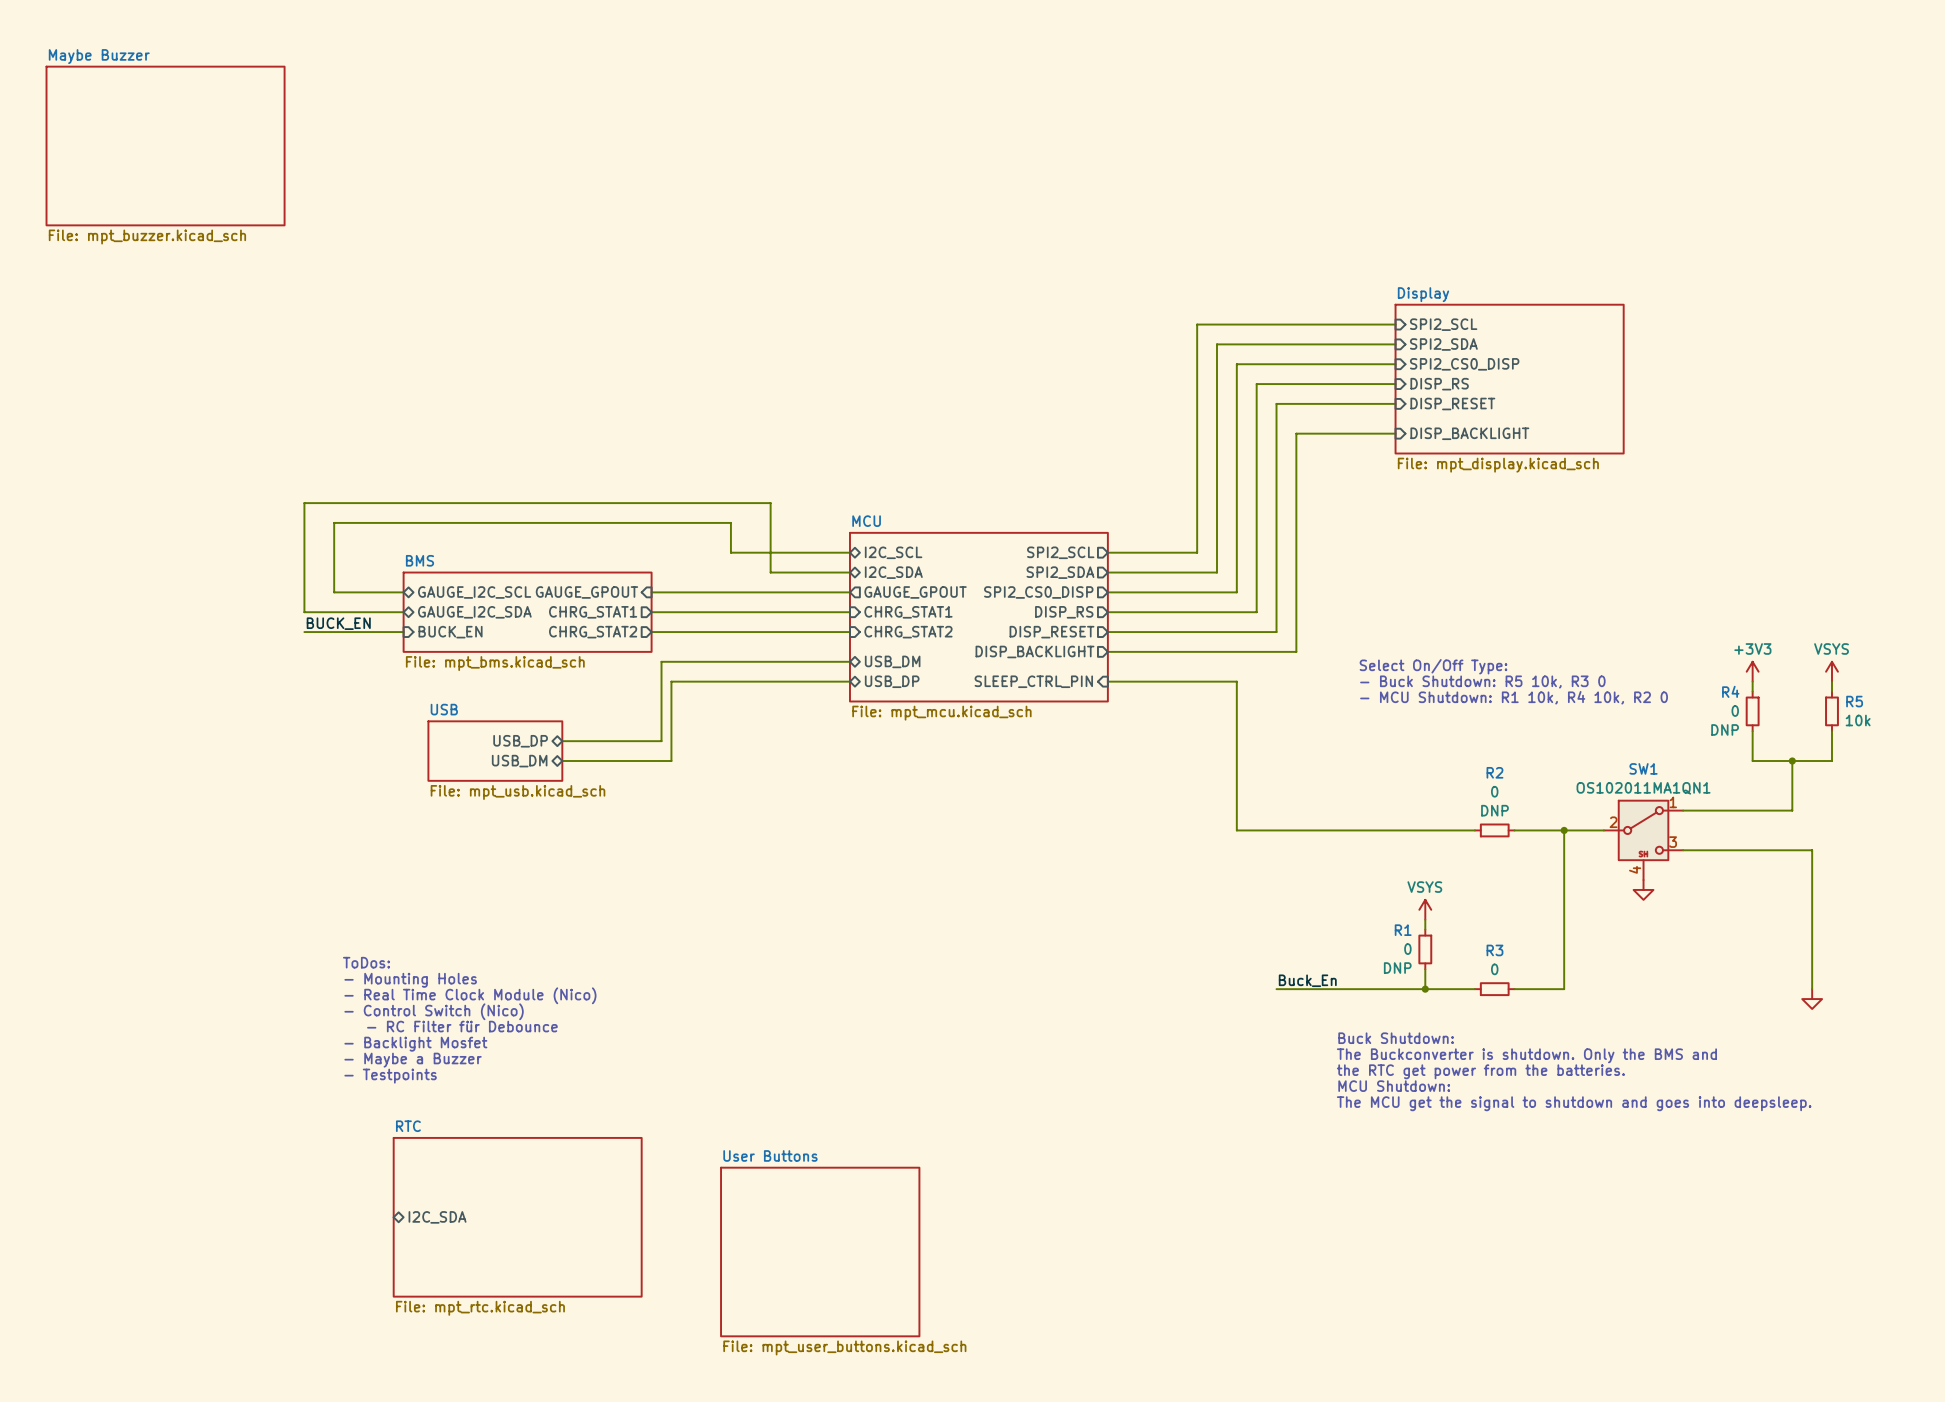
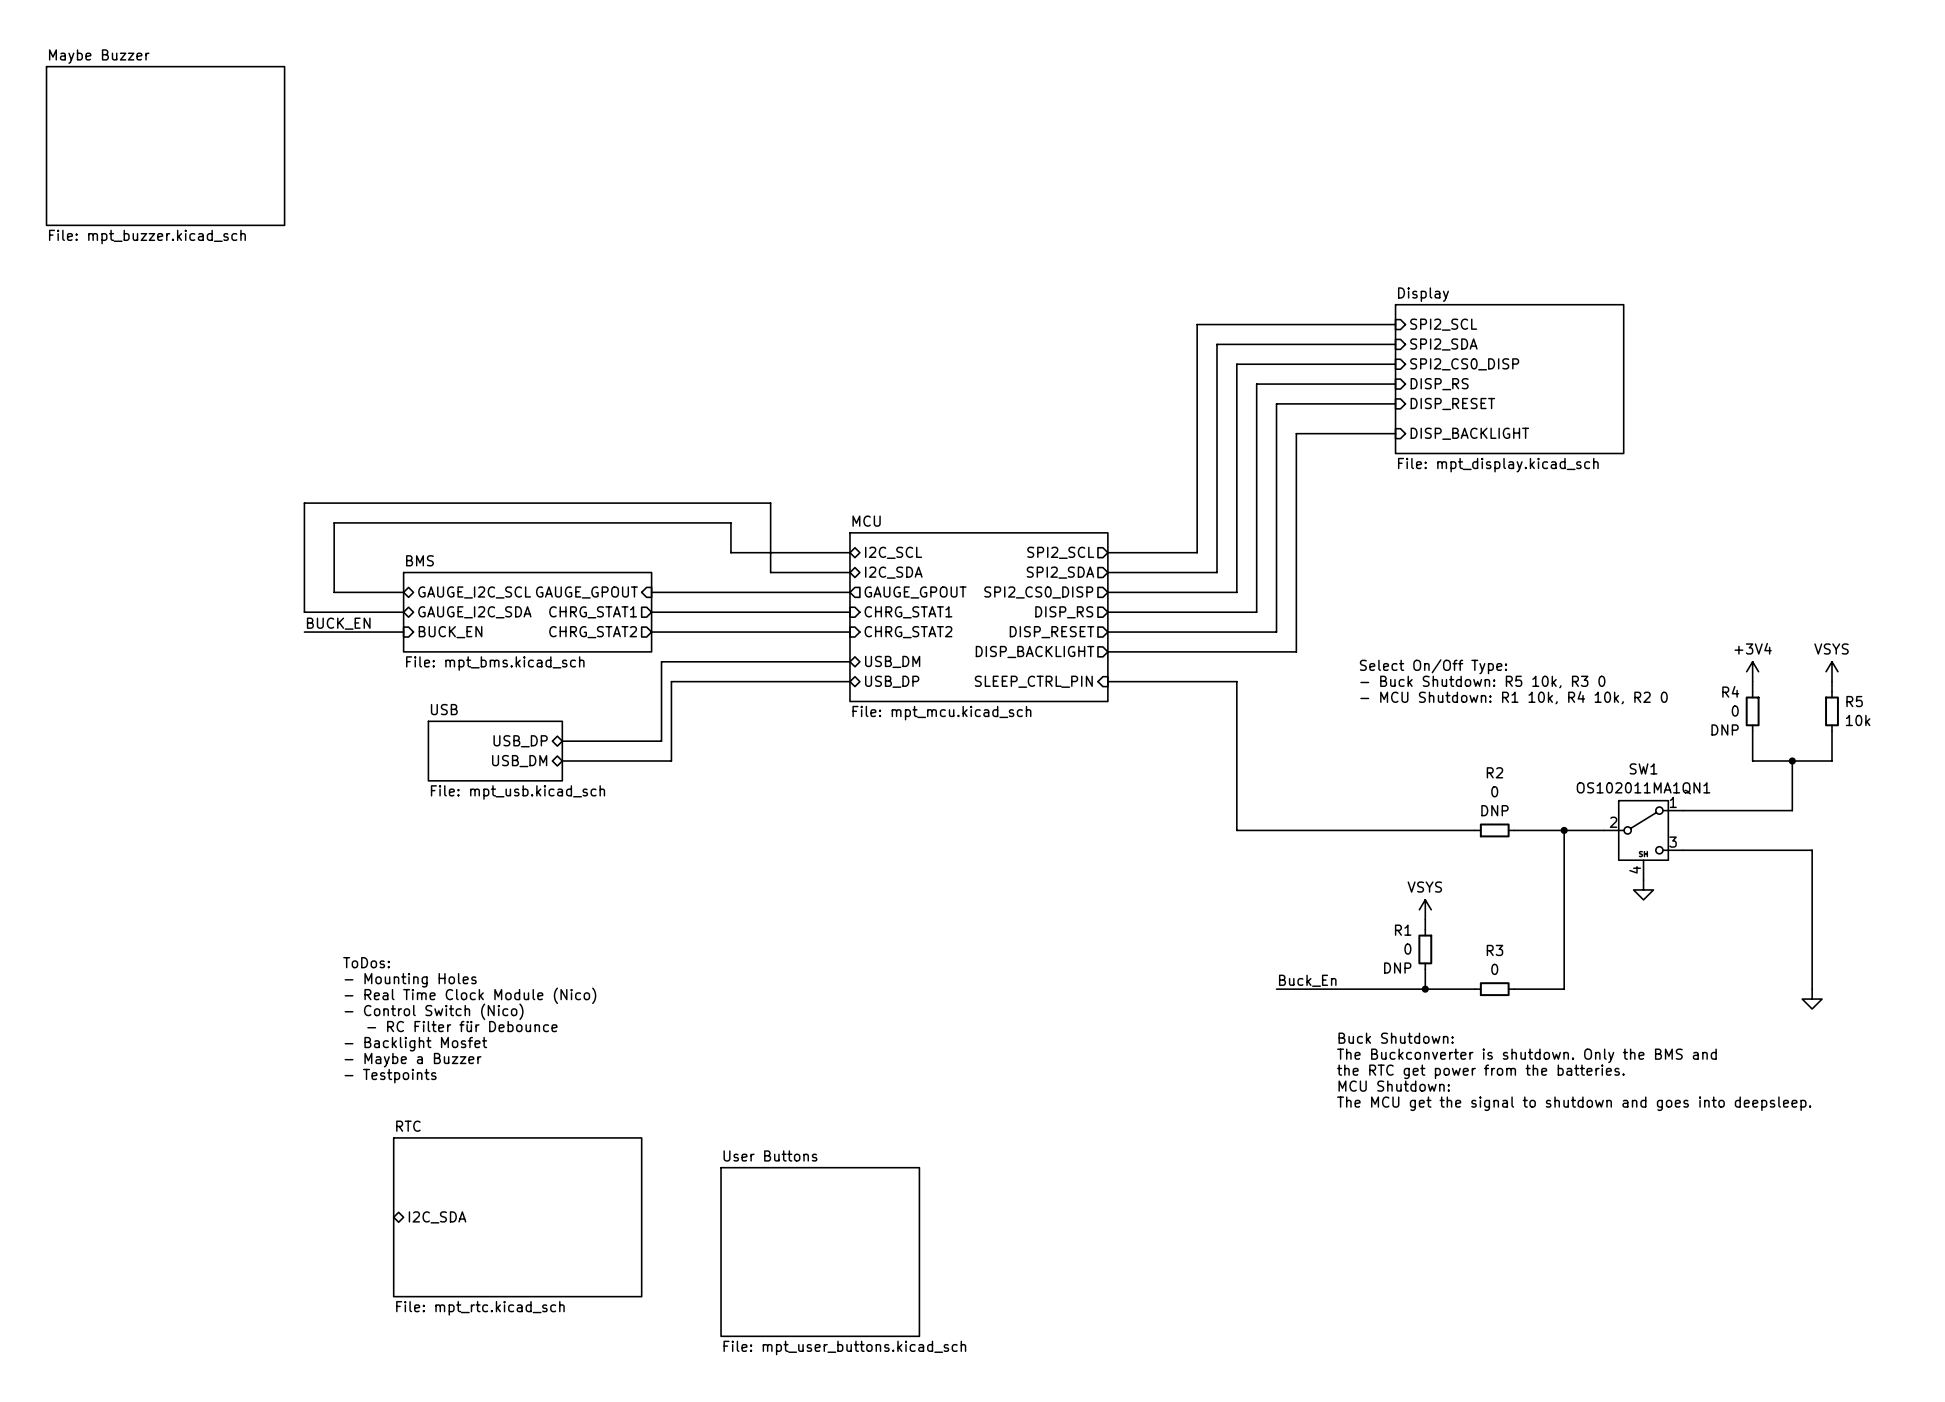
power symbol: +3V3 (1752, 671) -> +3V4 (1752, 671)

